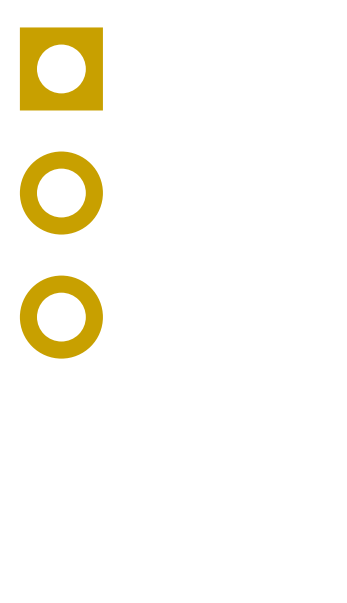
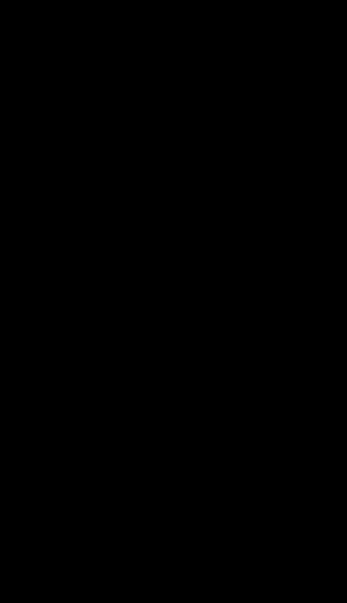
part: (61, 193) -> none

